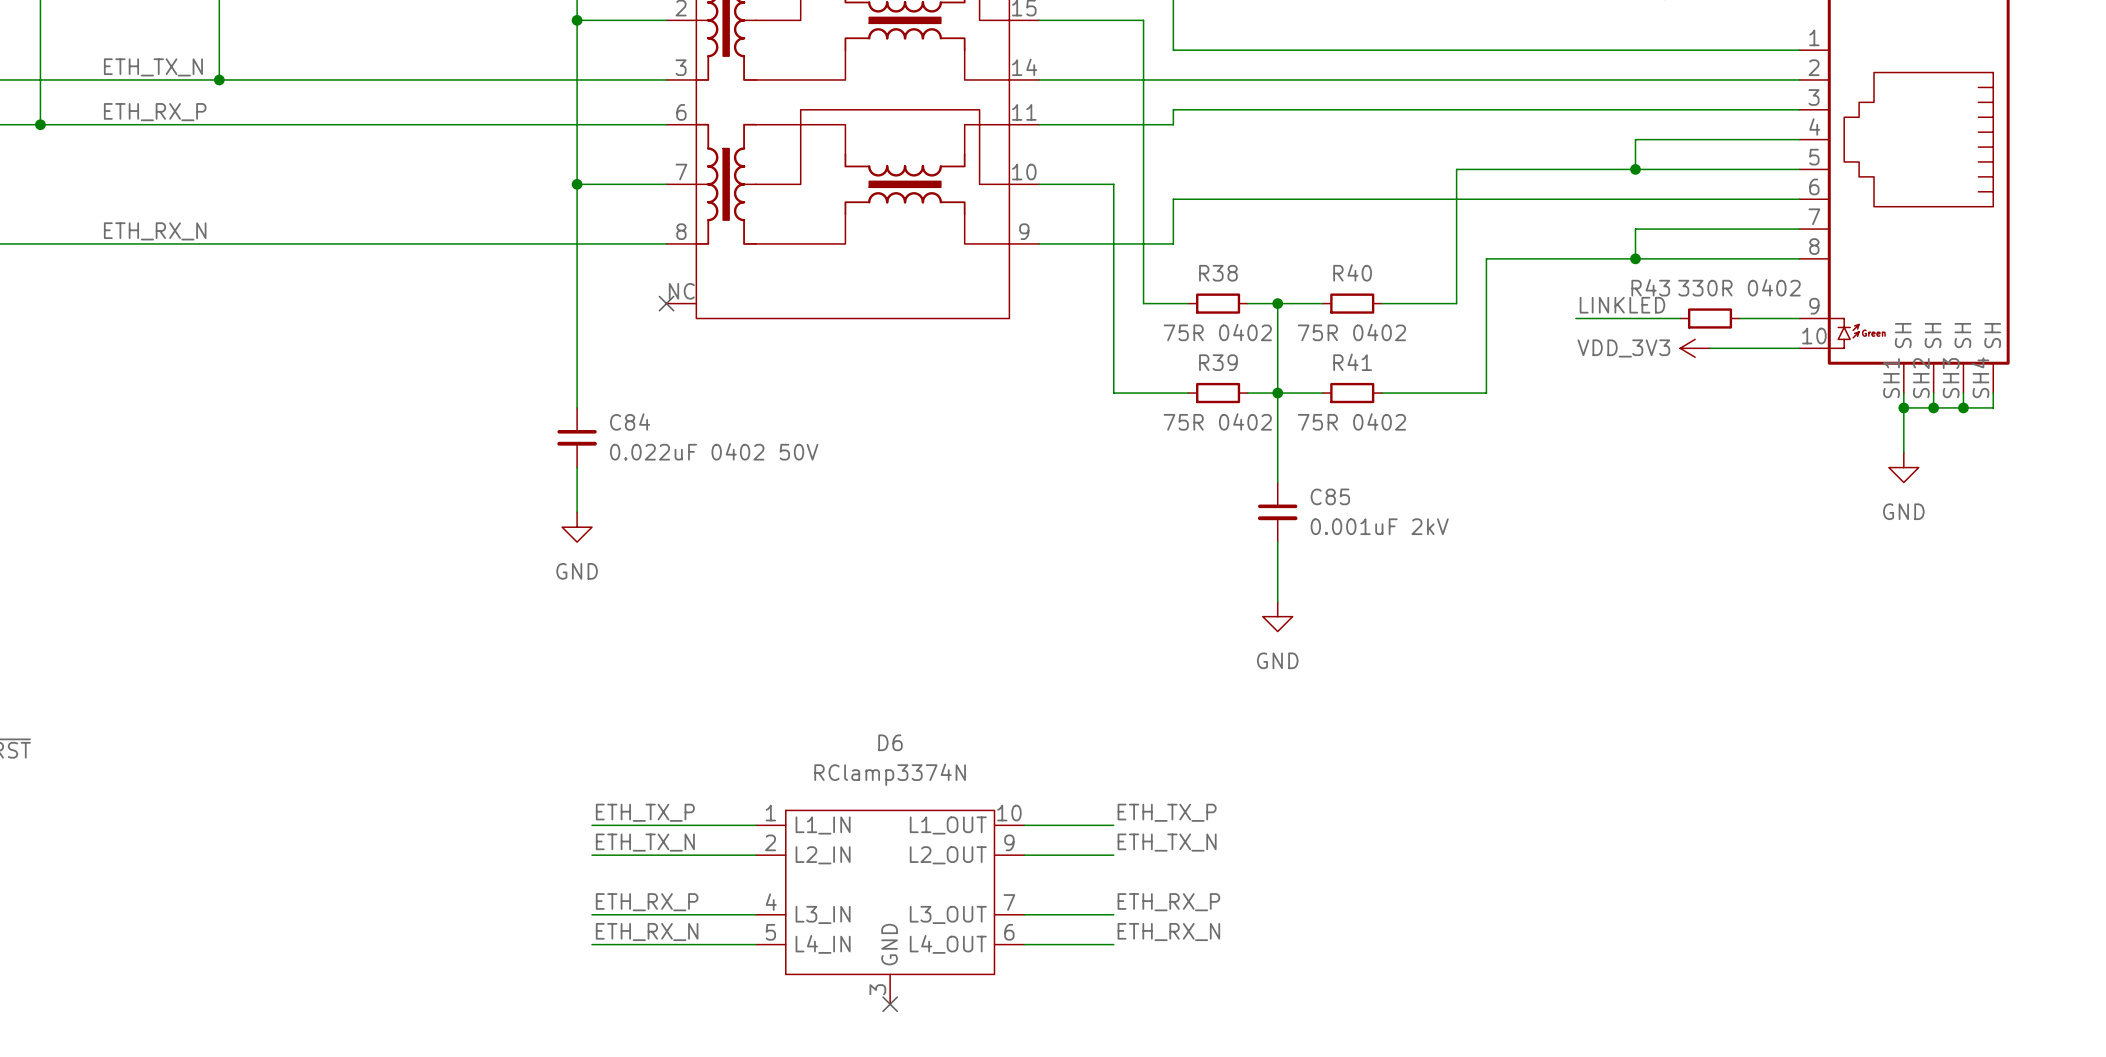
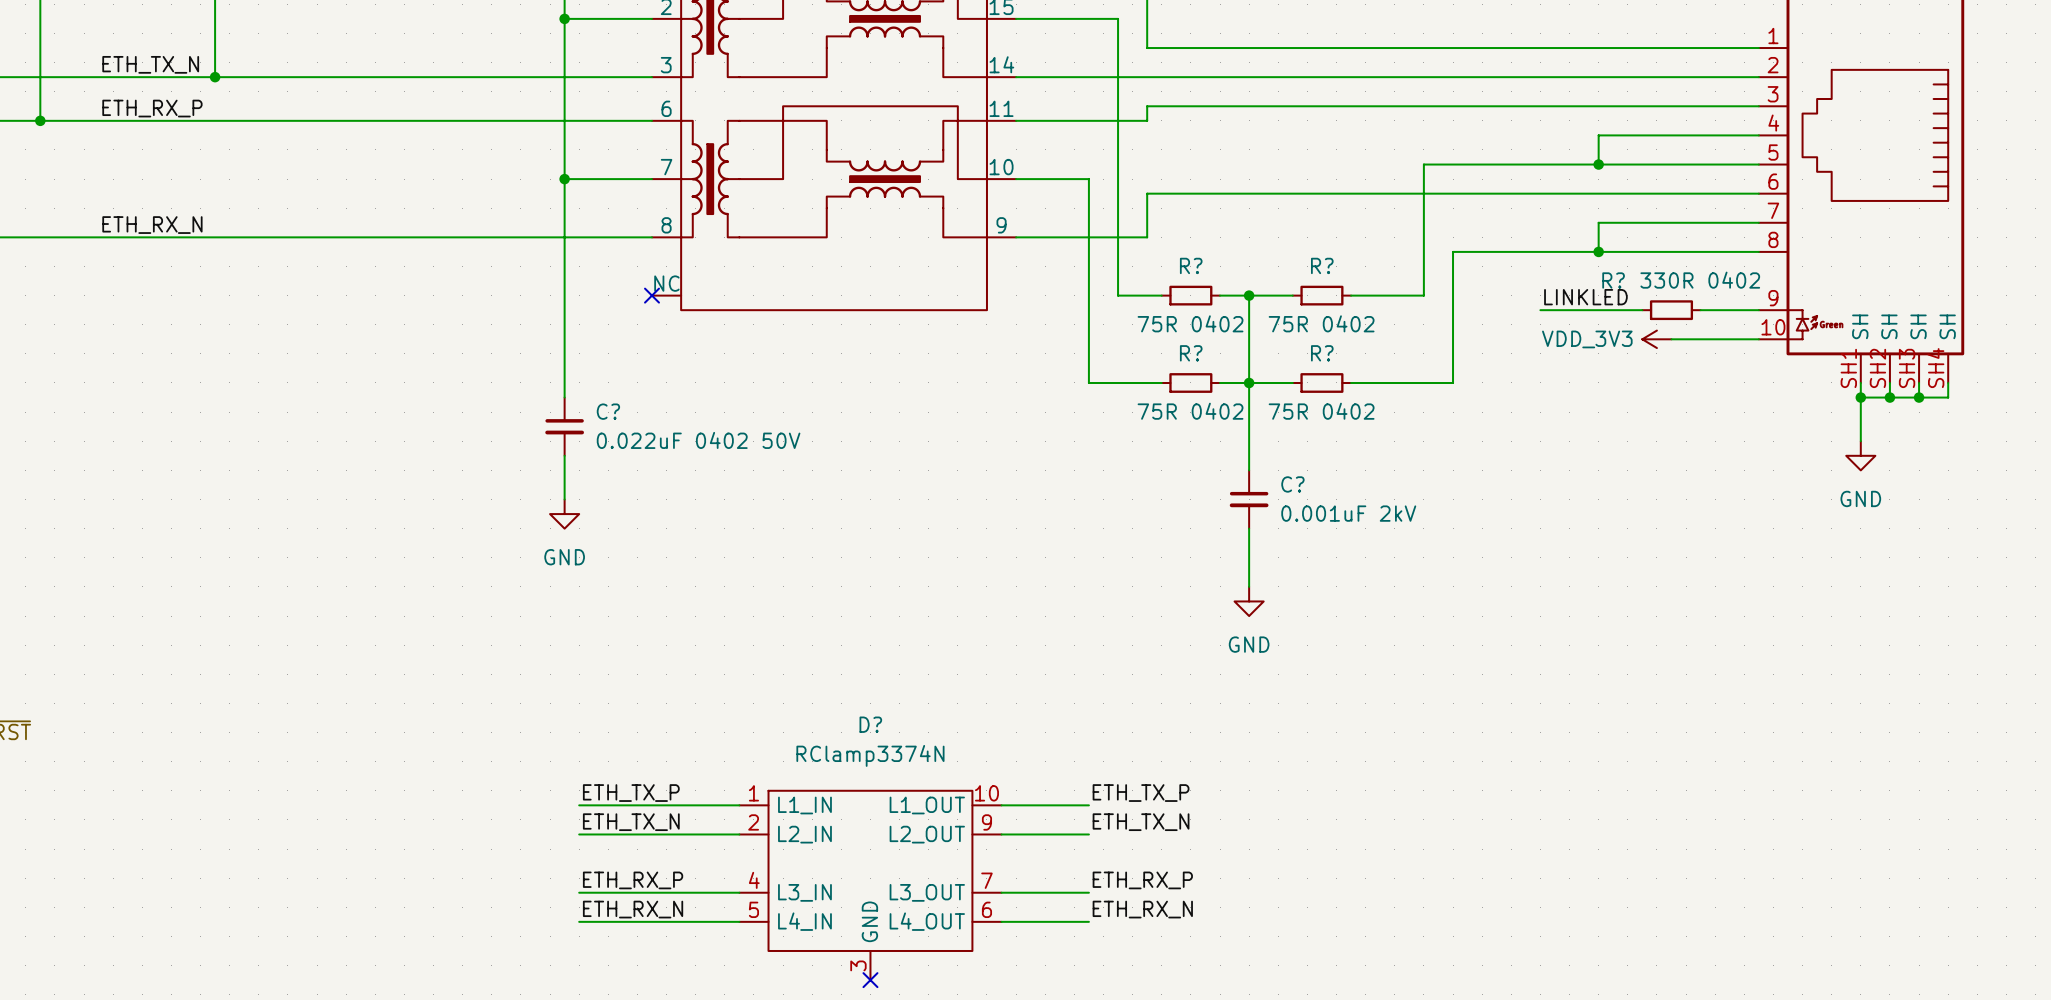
R40 name: R40 (1352, 272) -> R? (1322, 265)
R38 name: R38 (1218, 273) -> R? (1191, 265)
R43 name: R43 (1650, 287) -> R? (1613, 280)
R39 name: R39 (1218, 362) -> R? (1191, 353)
R41 name: R41 (1352, 362) -> R? (1322, 353)
C84 name: C84 (630, 422) -> C? (608, 411)
C85 name: C85 (1330, 496) -> C? (1292, 484)
D6 name: D6 (890, 742) -> D? (870, 724)

